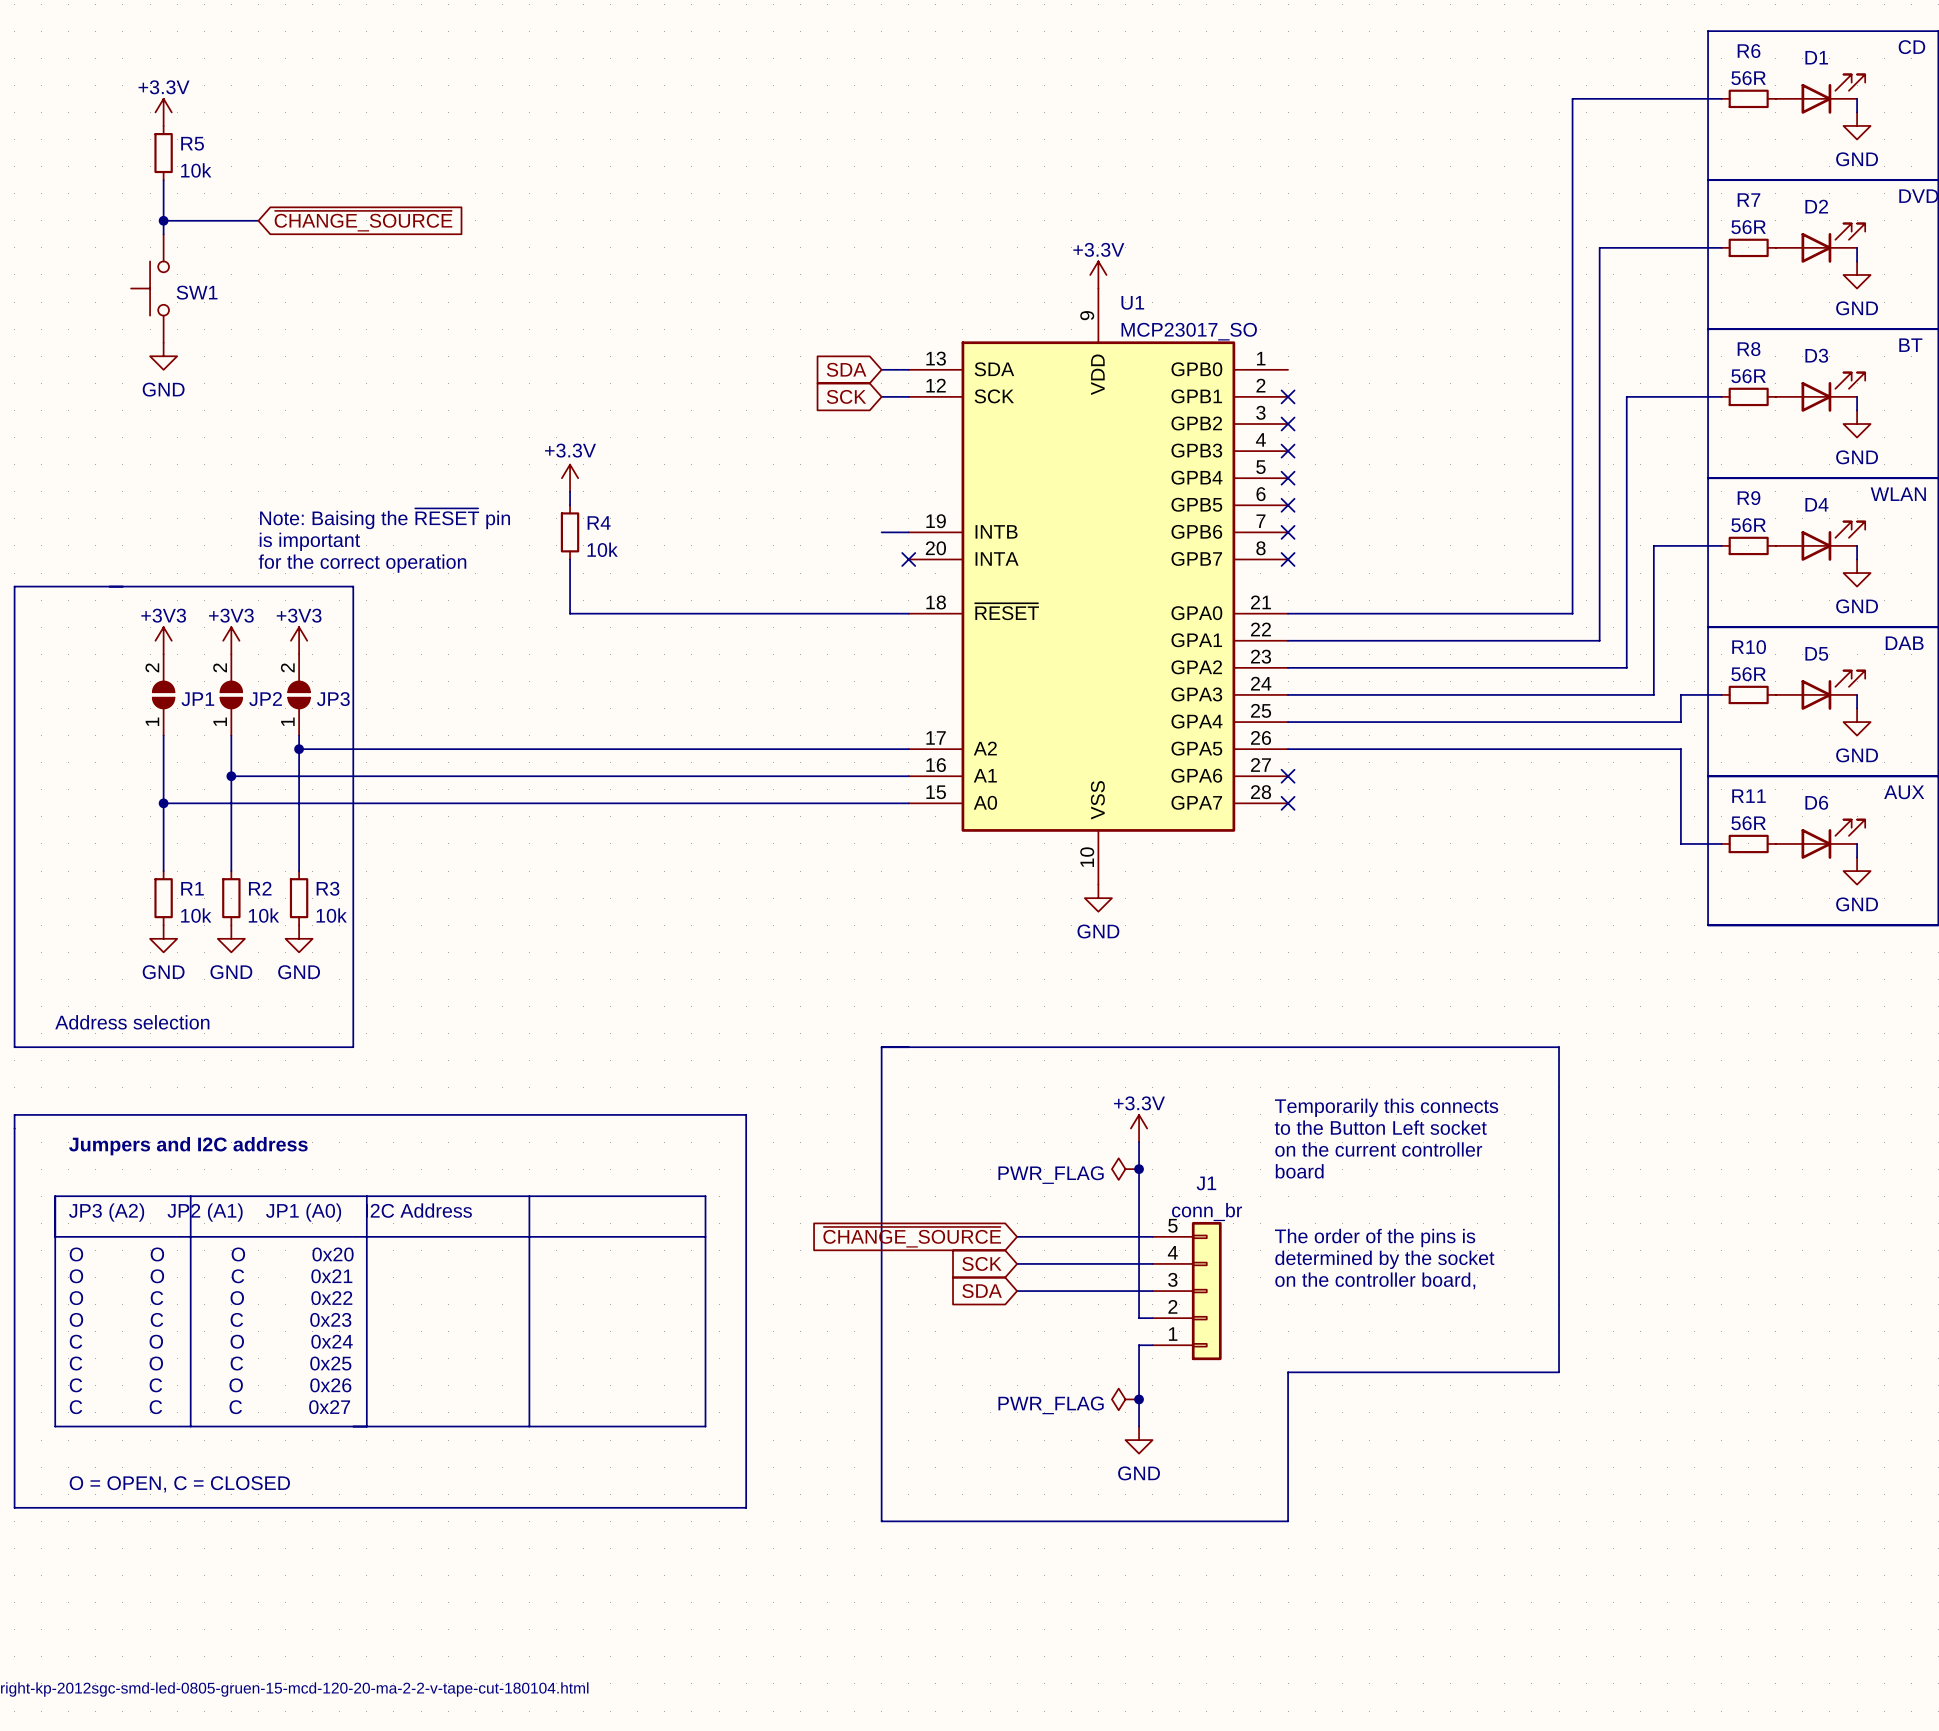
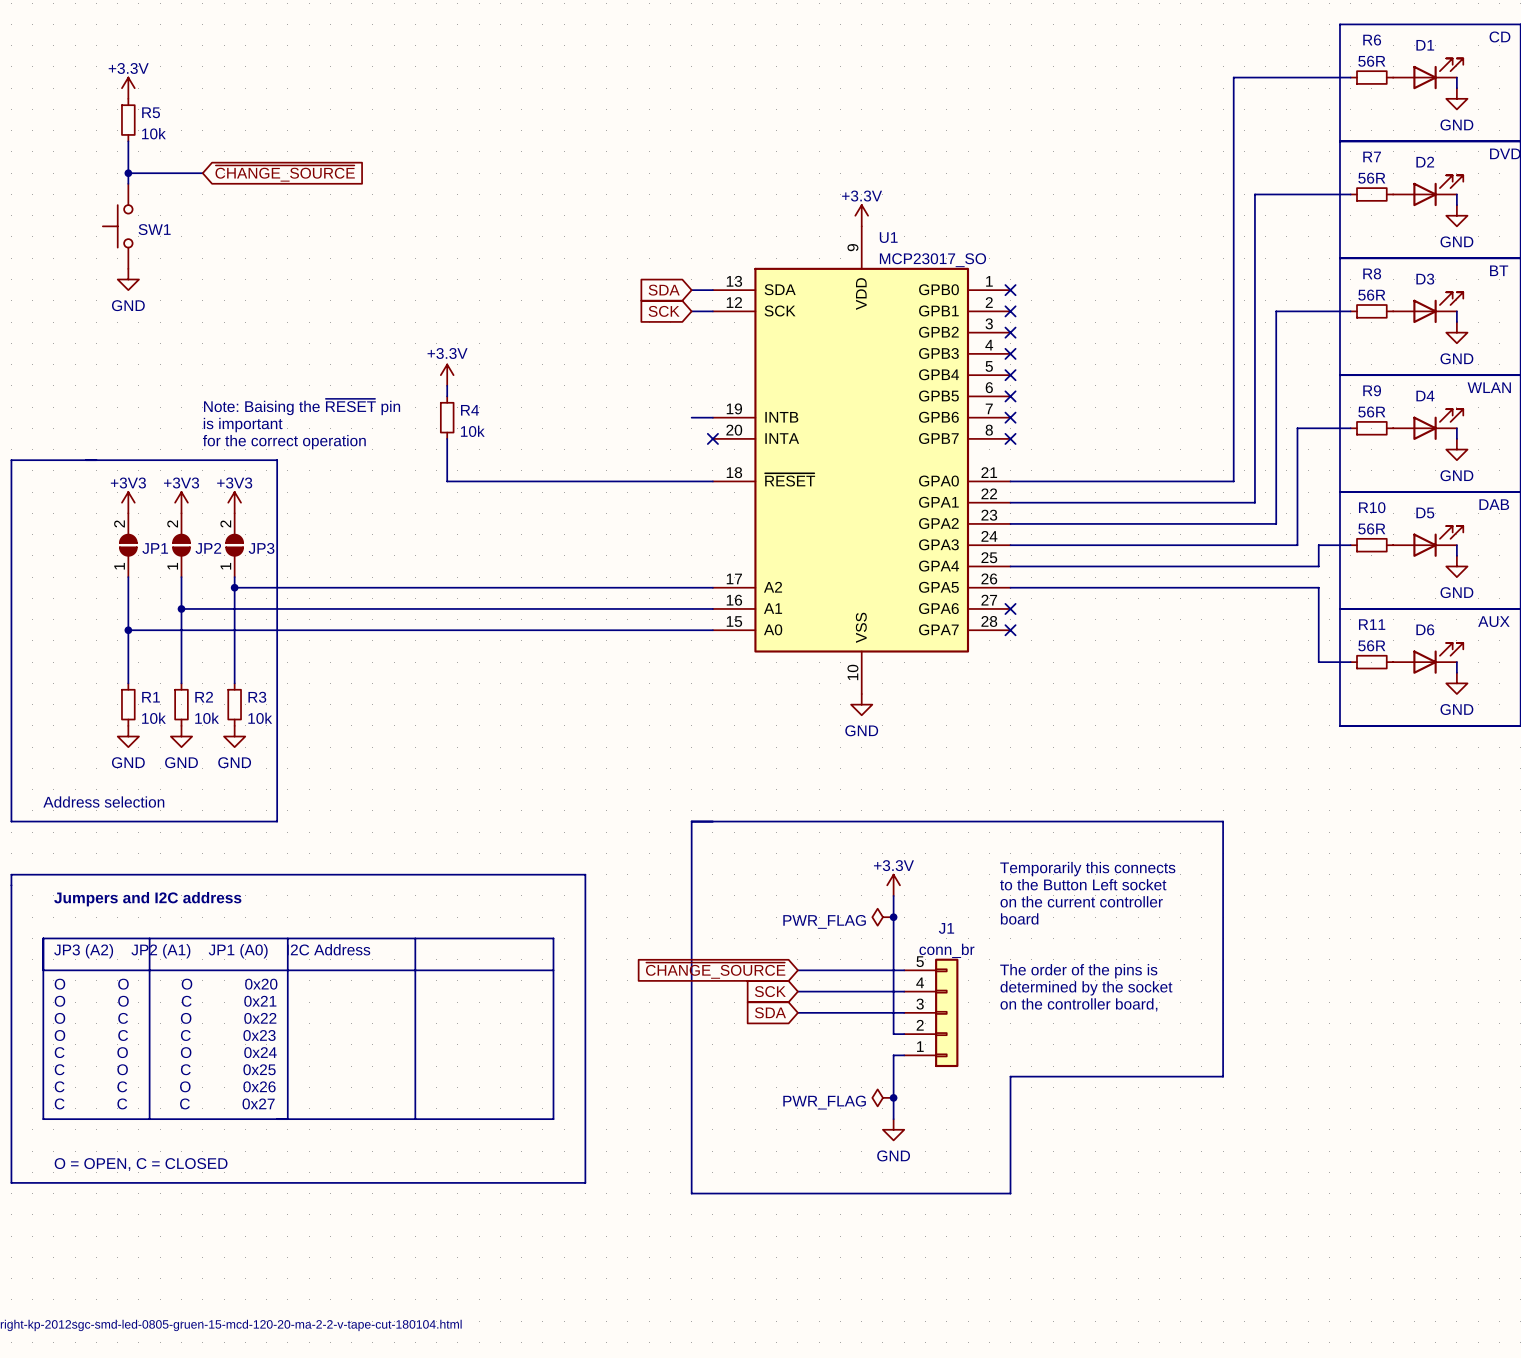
no-connect mark: none -> (1010, 290)

